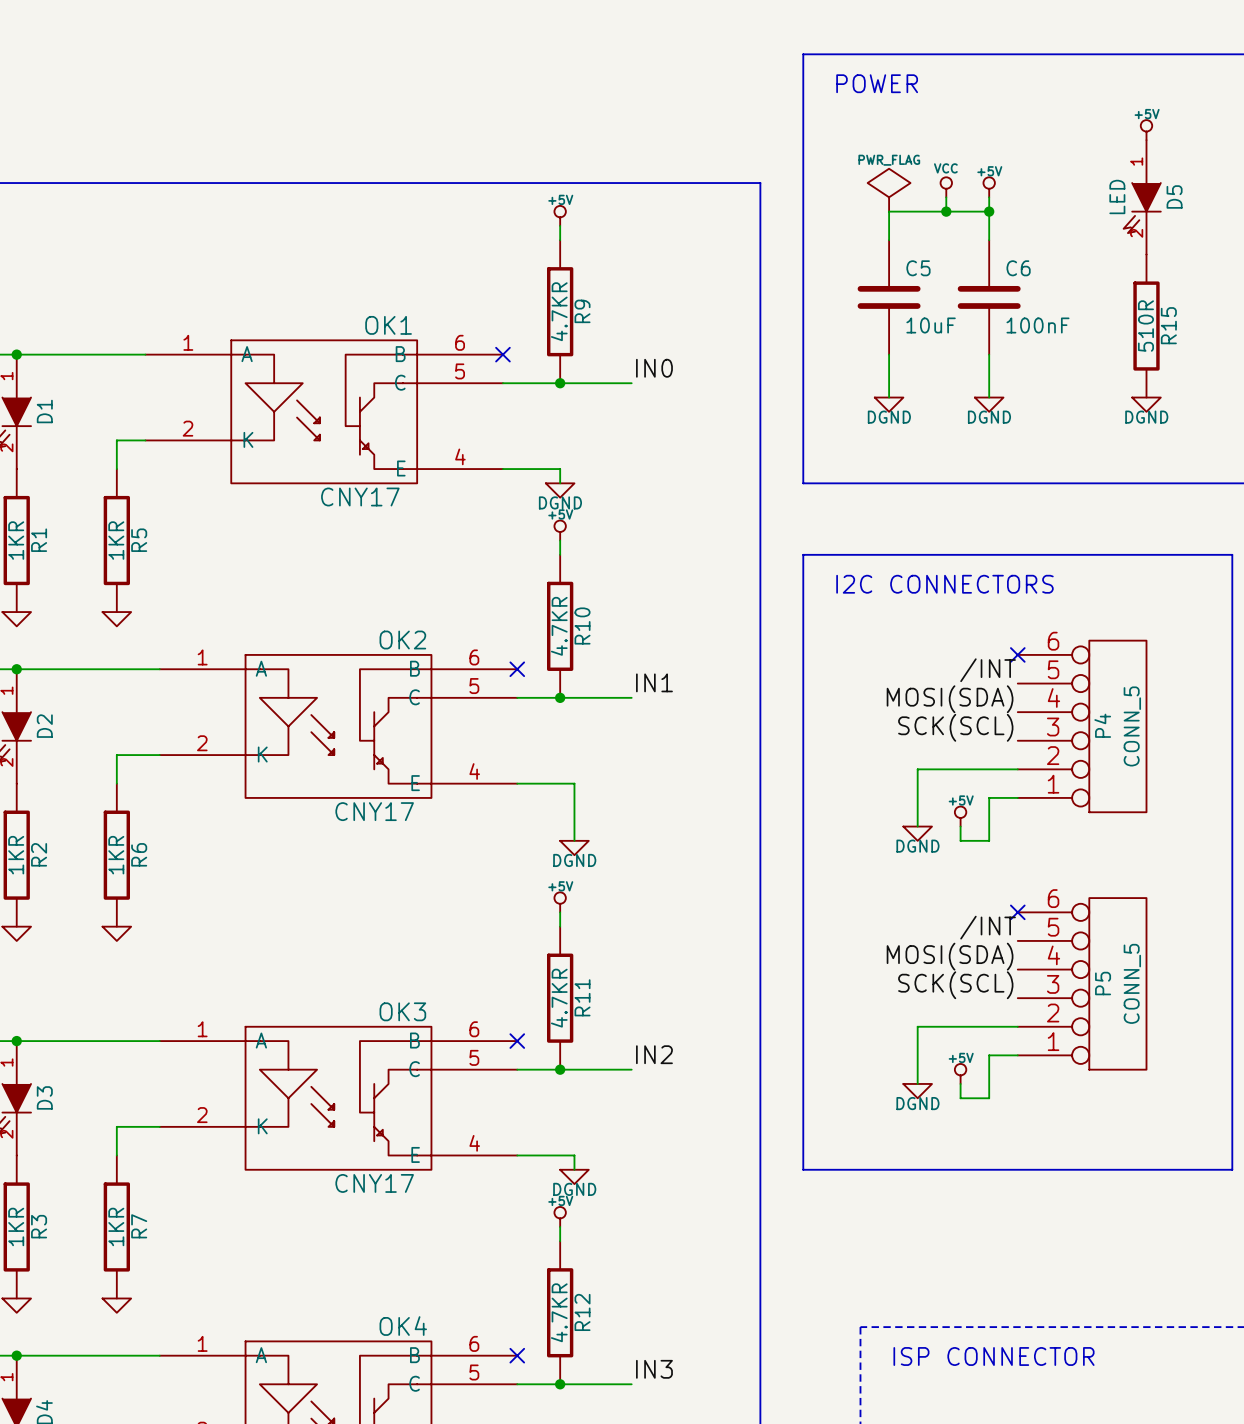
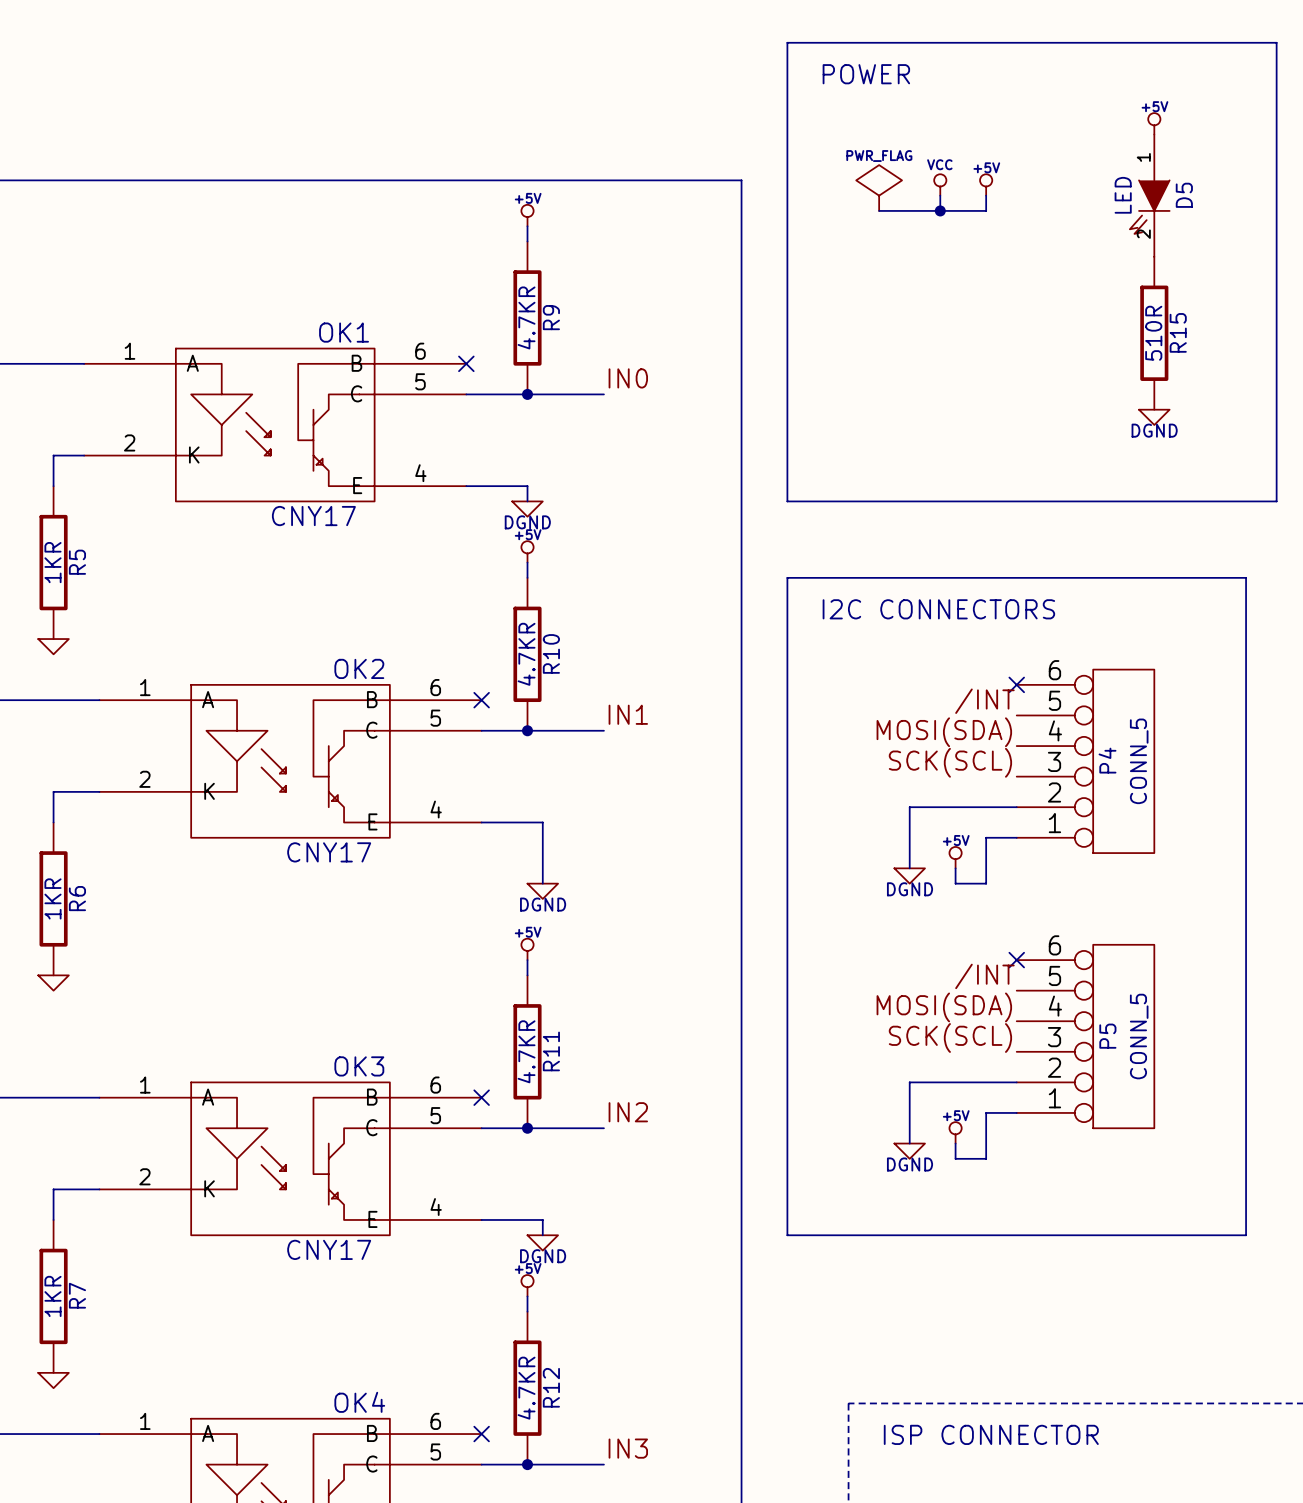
wire: (889, 211) (889, 240) -> none
wire: (989, 211) (989, 240) -> none
junction: (989, 211) -> none
C5: 10uF (889, 297) -> none
C6: 100nF (989, 297) -> none
wire: (889, 354) (889, 397) -> none
wire: (989, 354) (989, 397) -> none
power symbol: DGND (889, 404) -> none
power symbol: DGND (989, 404) -> none

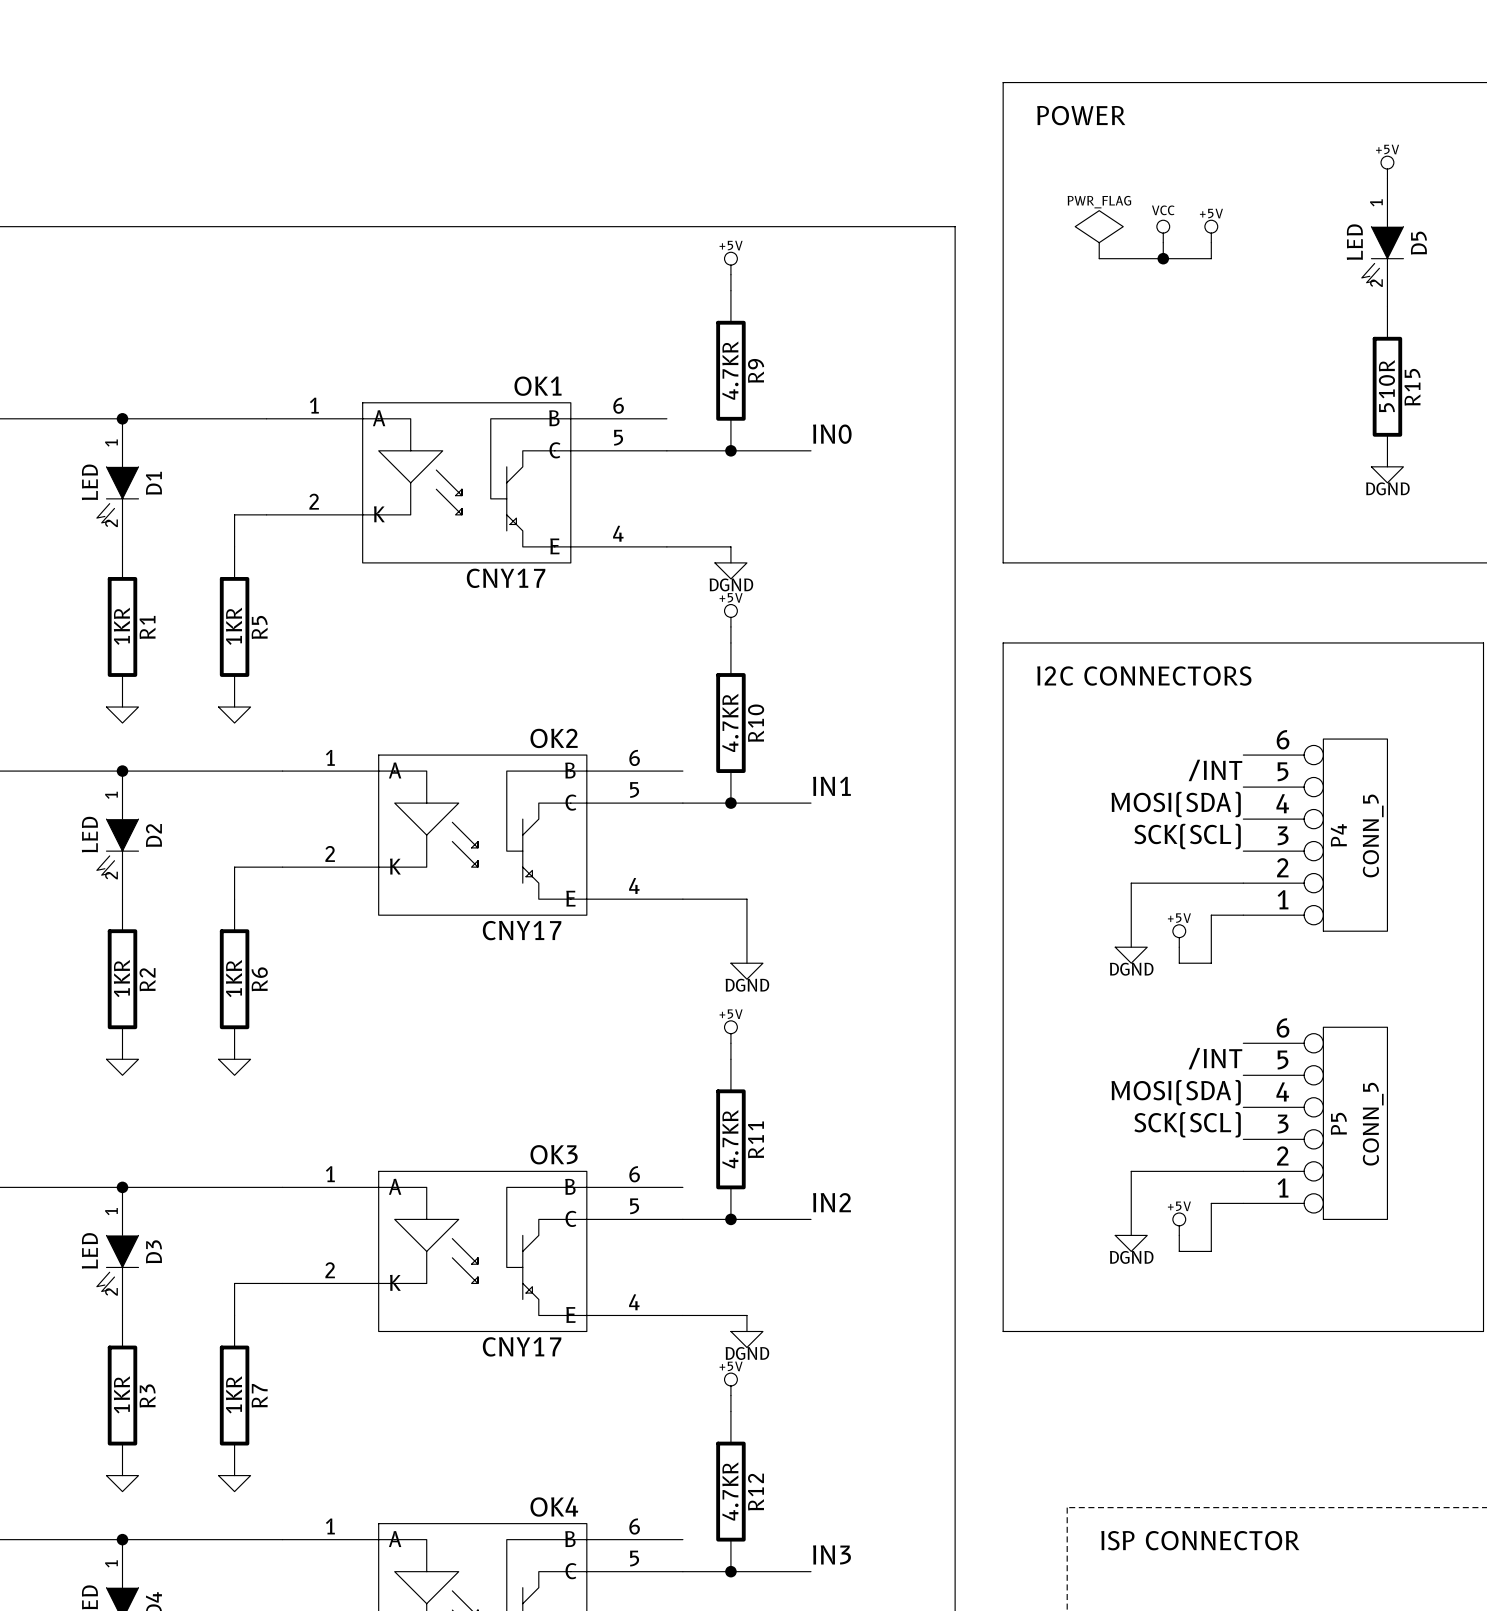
no-connect mark: (466, 363) -> none
no-connect mark: (1016, 684) -> none
no-connect mark: (481, 700) -> none
no-connect mark: (1016, 960) -> none
no-connect mark: (481, 1097) -> none
no-connect mark: (481, 1434) -> none

